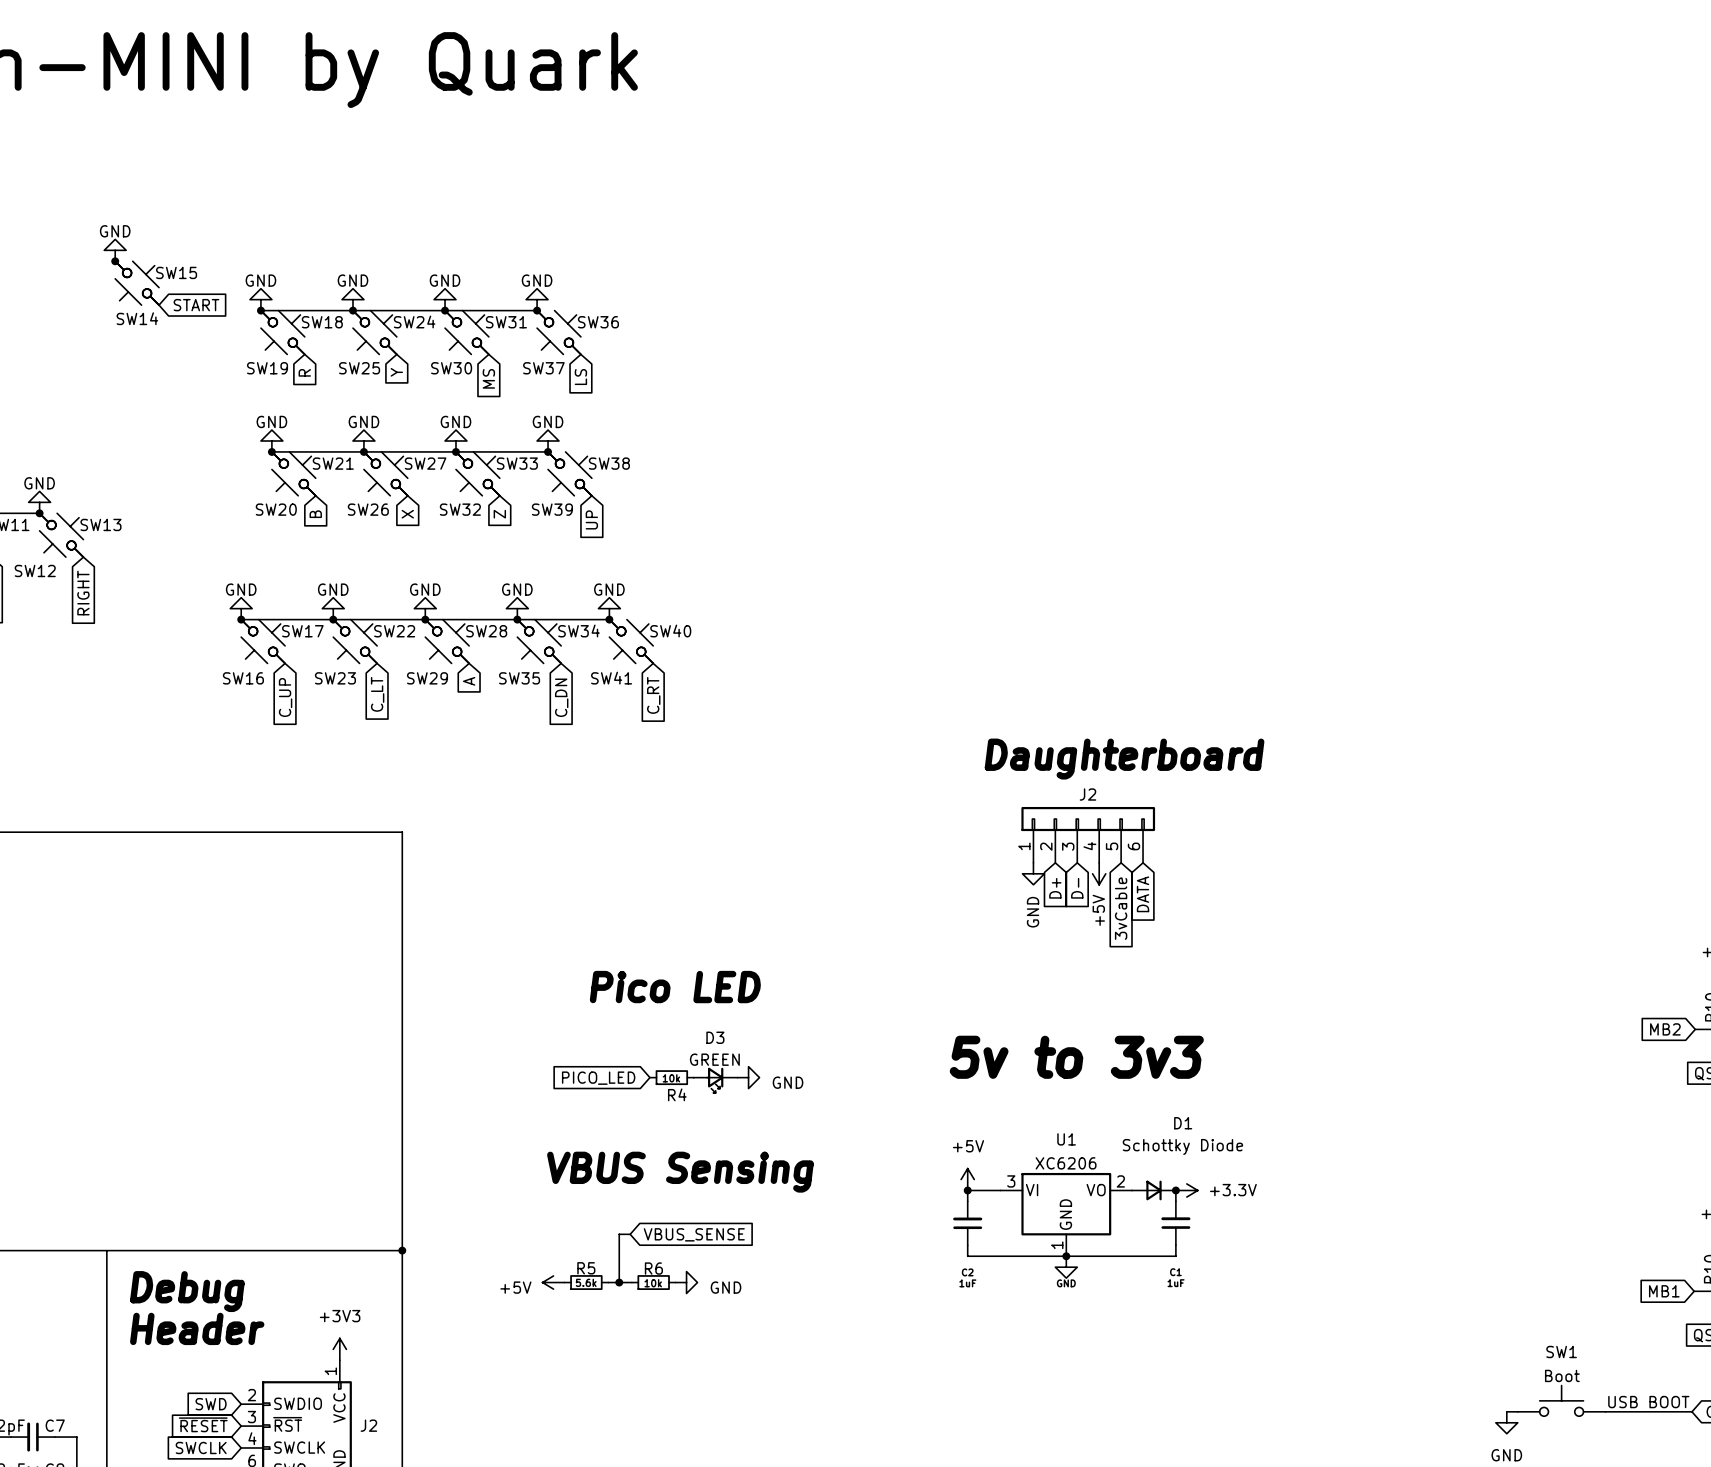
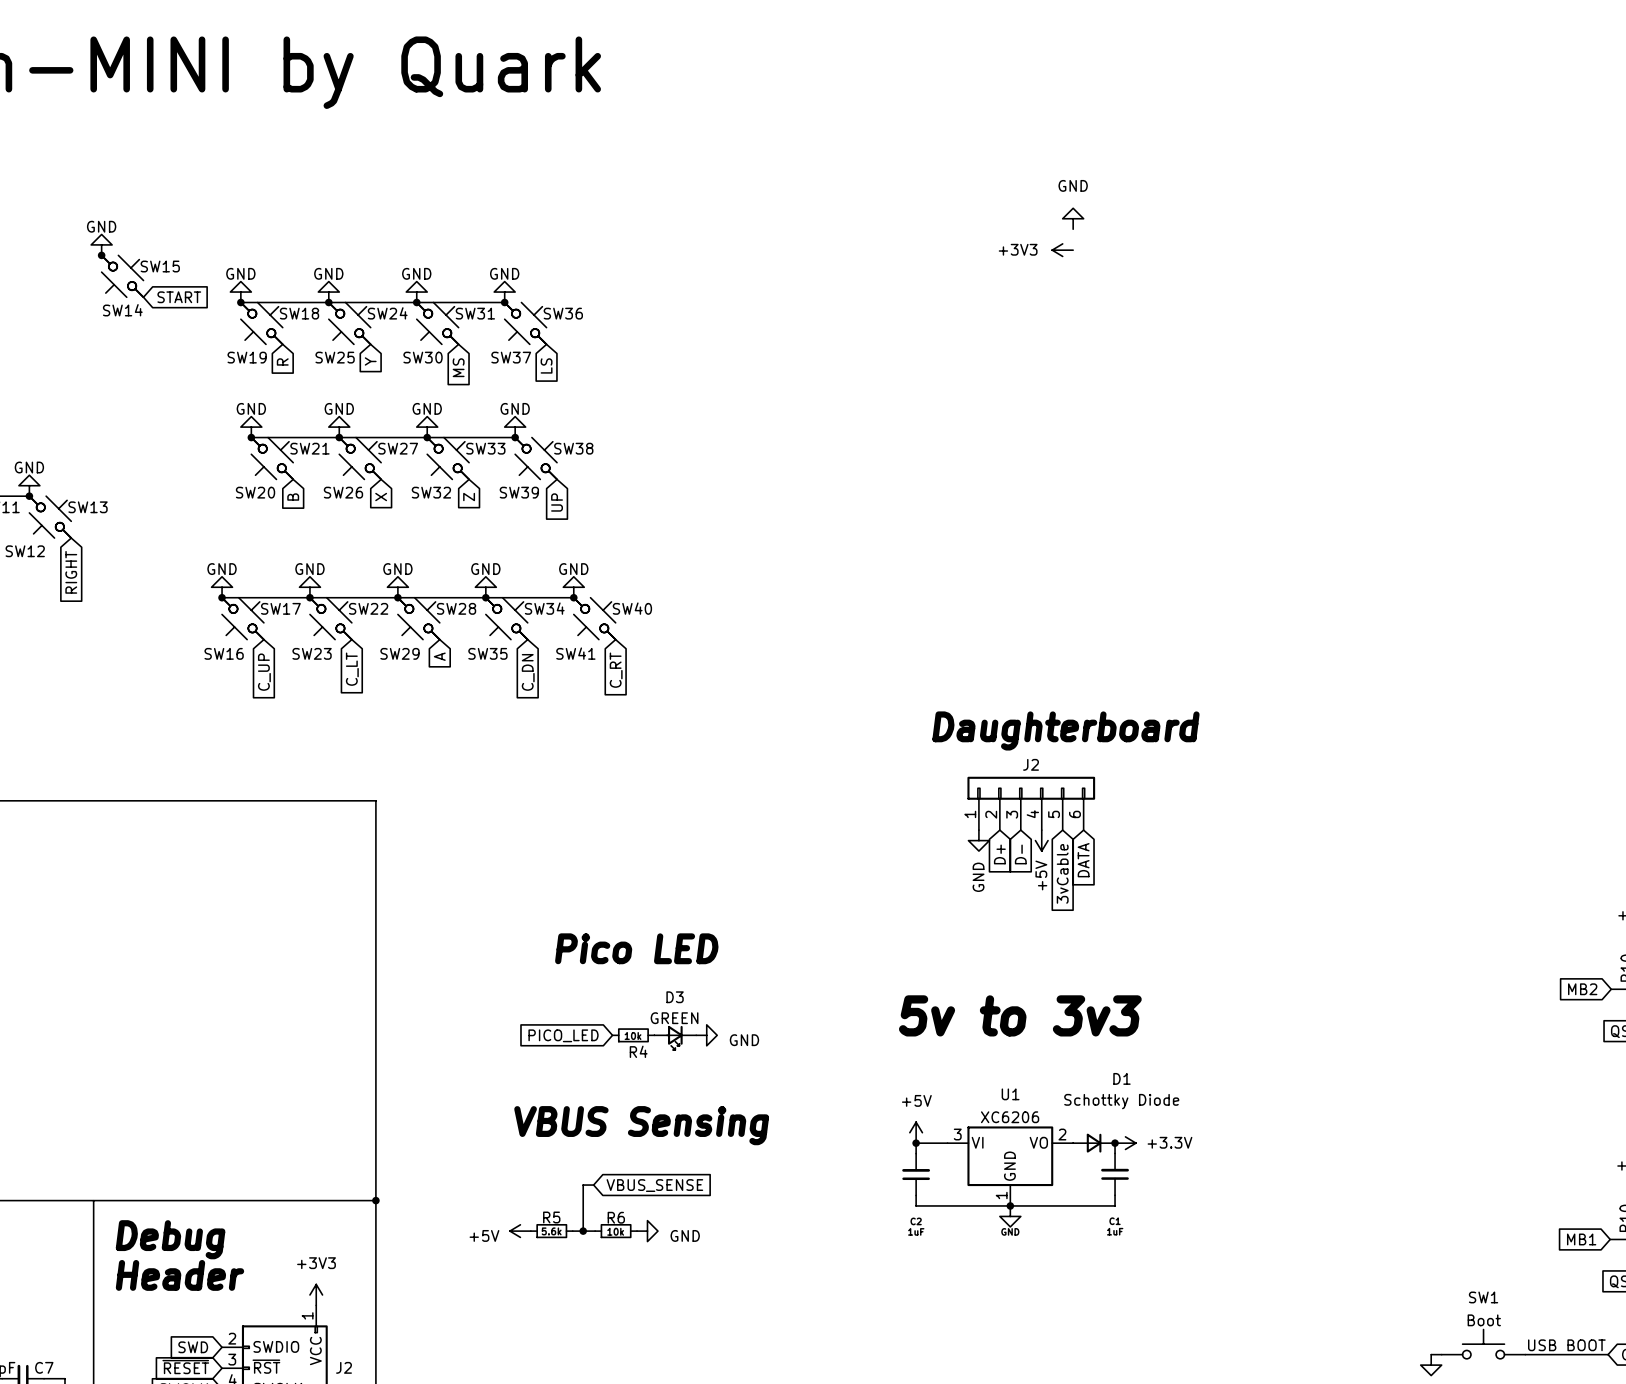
power symbol: none -> GND (1073, 218)
power symbol: none -> +3V3 (1062, 250)

